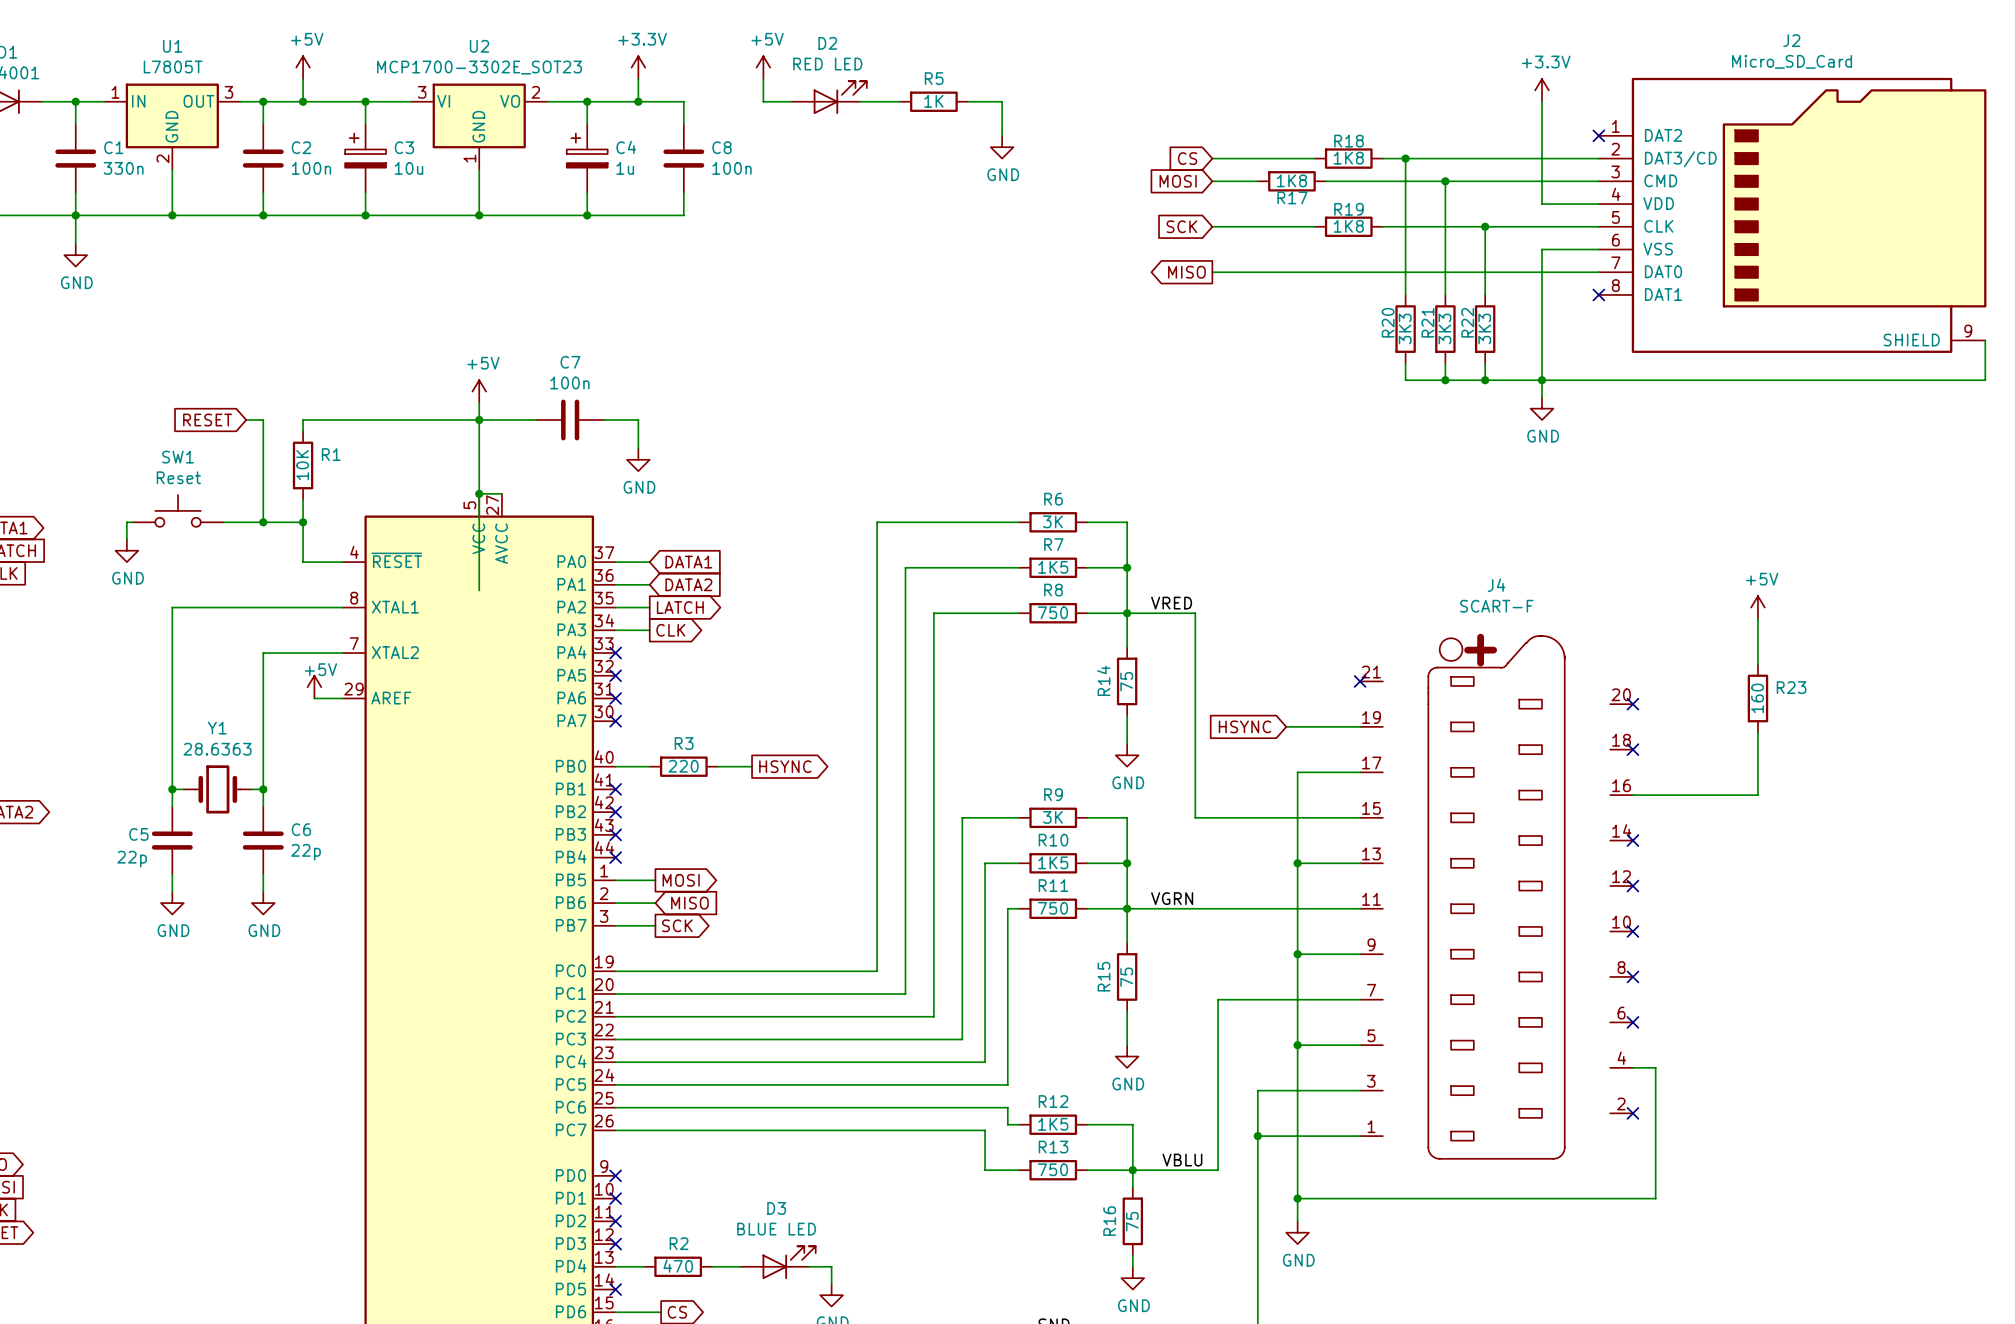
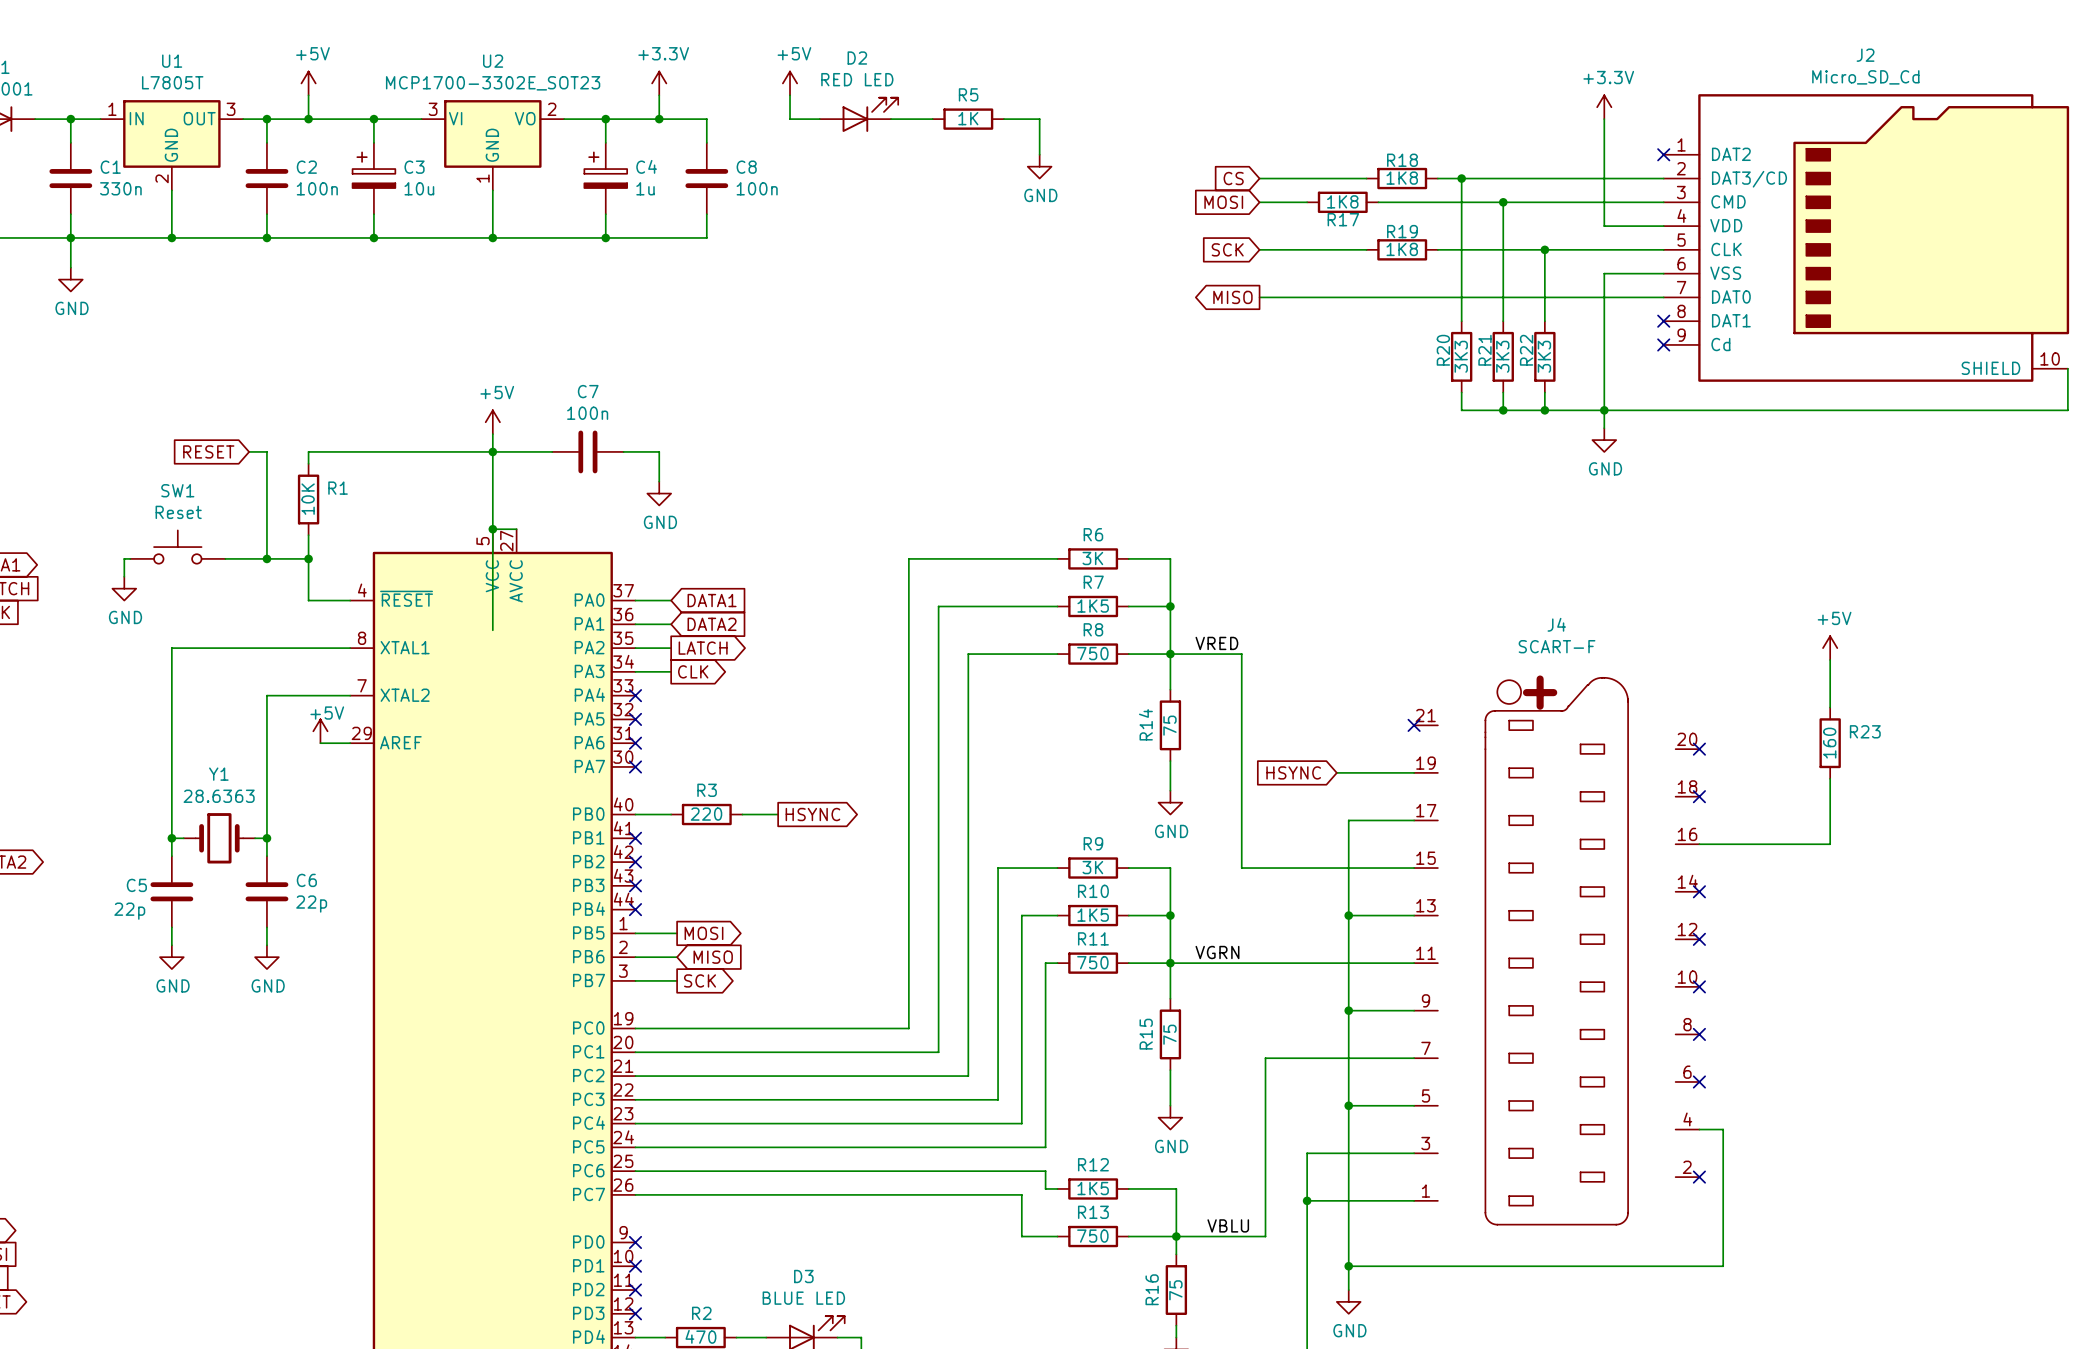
J2 value: Micro_SD_Card (1792, 61) -> Micro_SD_Cd (1865, 77)
J2 symbol: [1598, 77, 1987, 353] -> [1663, 94, 2070, 382]
no-connect mark: none -> (1663, 344)

